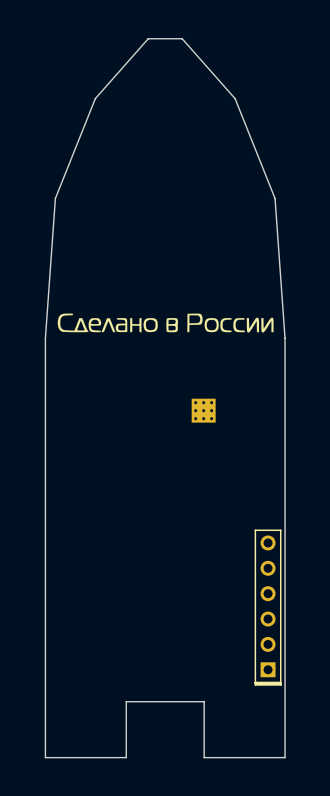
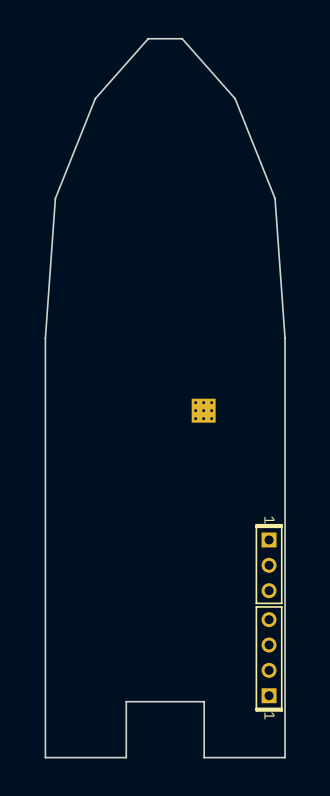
drawing: [57, 313, 274, 333] -> none
part: none -> (269, 564)
part: (268, 607) -> none
part: none -> (269, 658)

